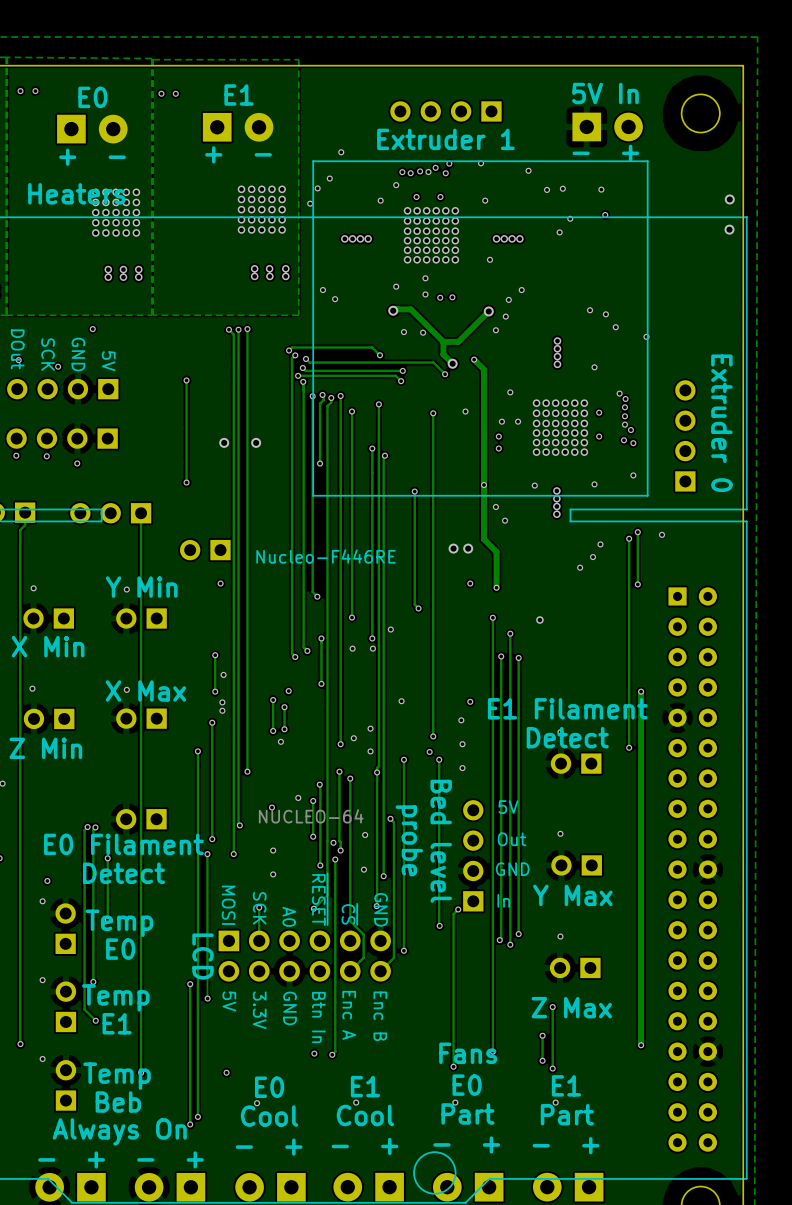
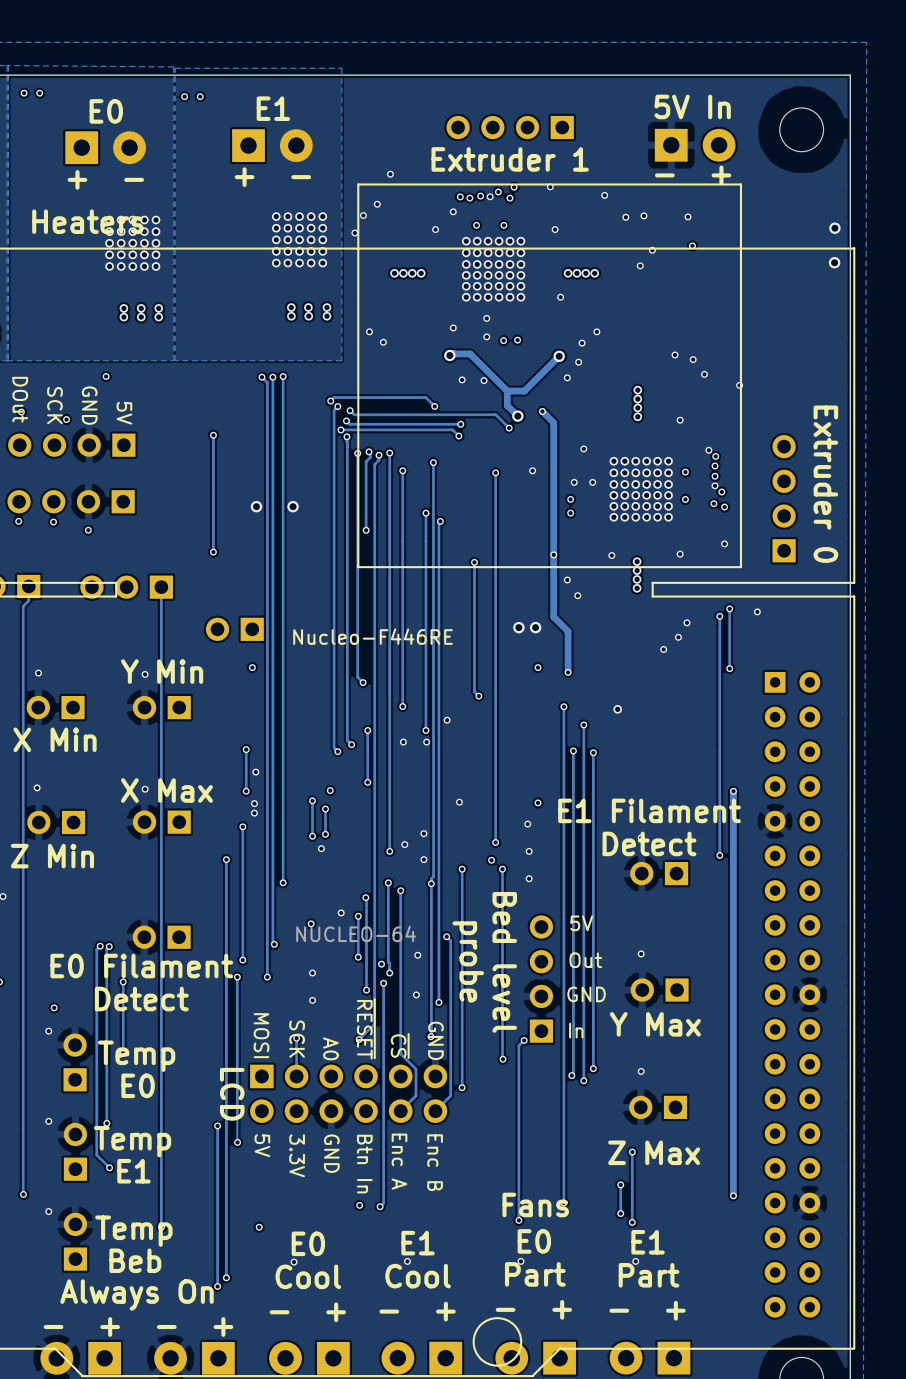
via: none -> (24, 93)
via: none -> (39, 93)
via: none -> (184, 96)
via: none -> (200, 96)
via: (20, 91) -> none
via: (35, 91) -> none
via: (161, 93) -> none
via: (175, 93) -> none

